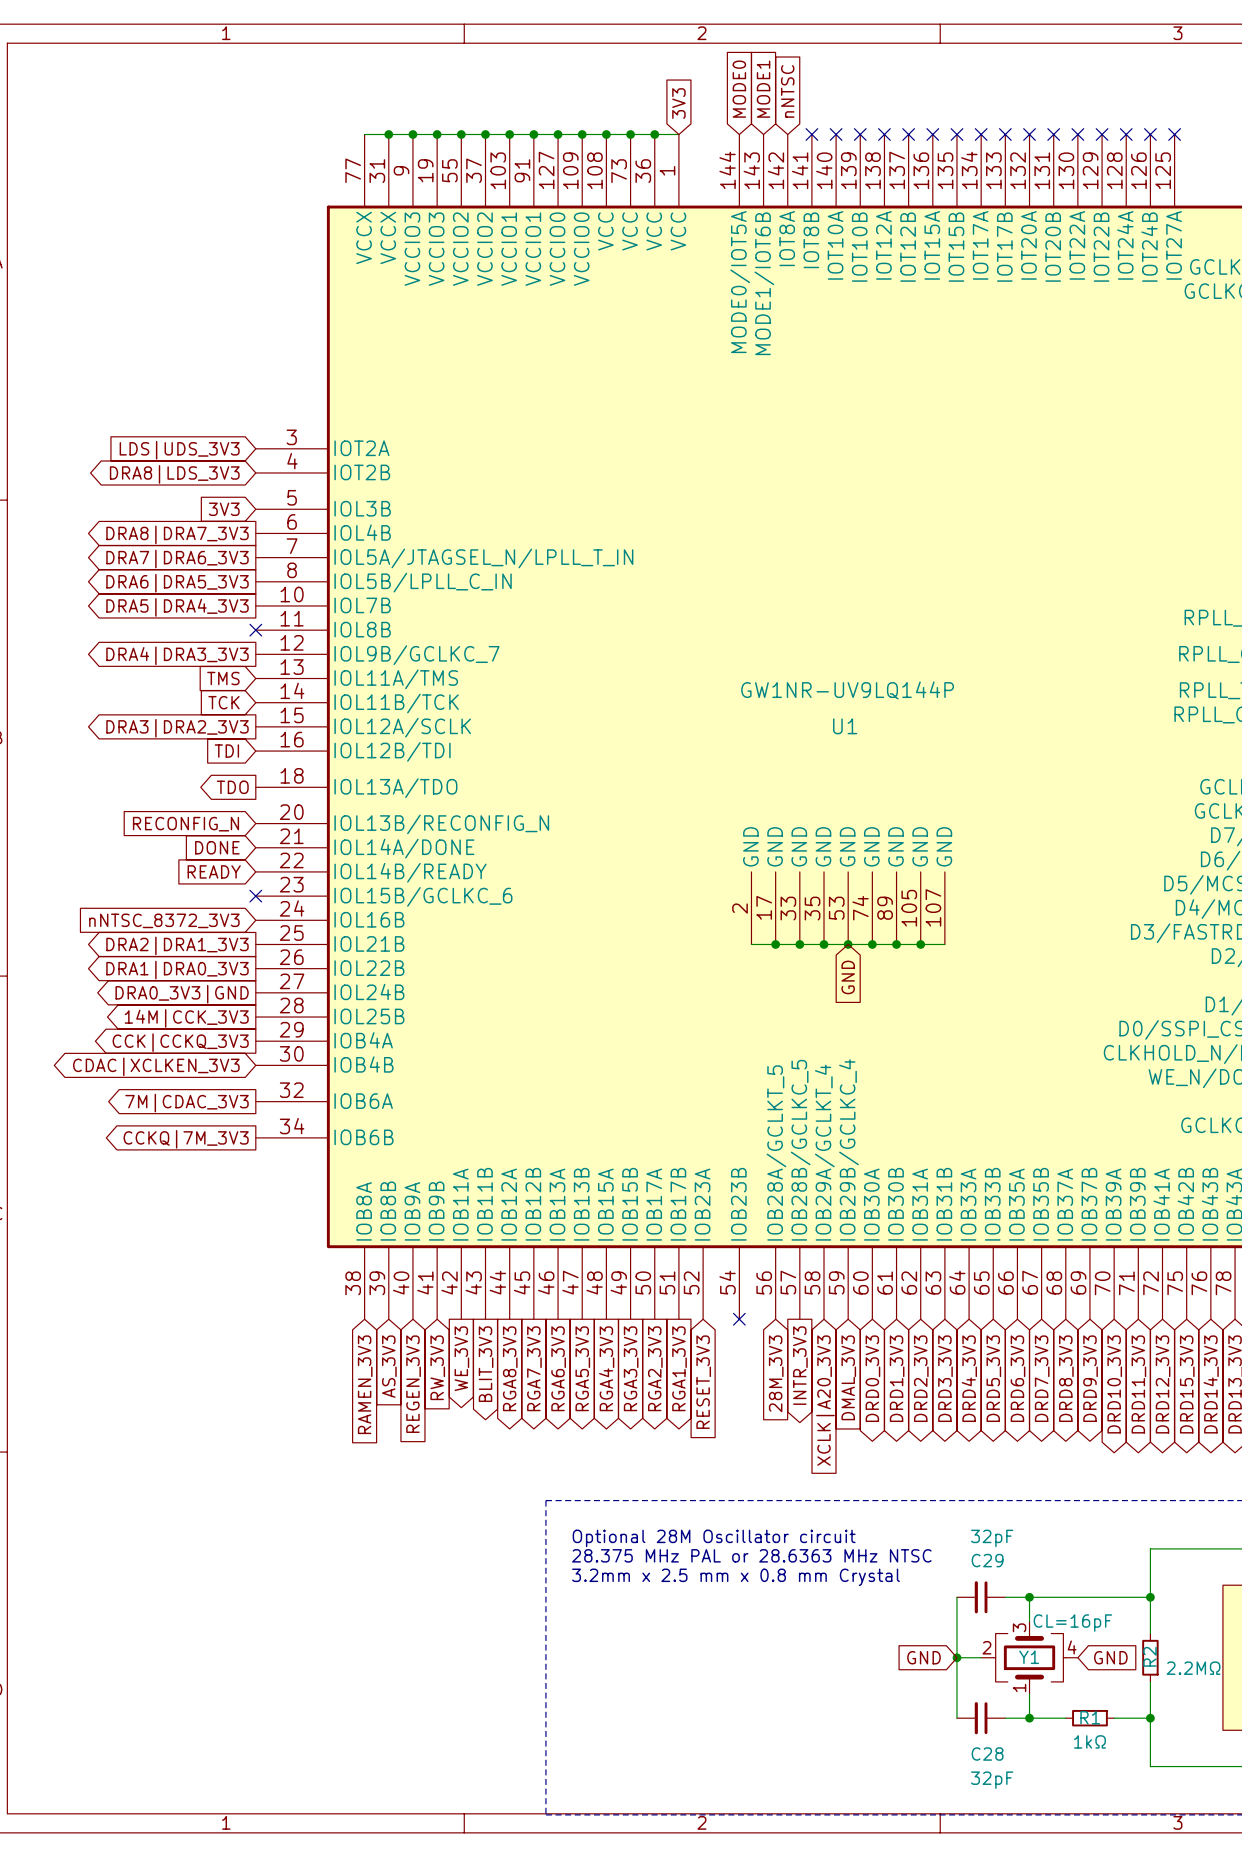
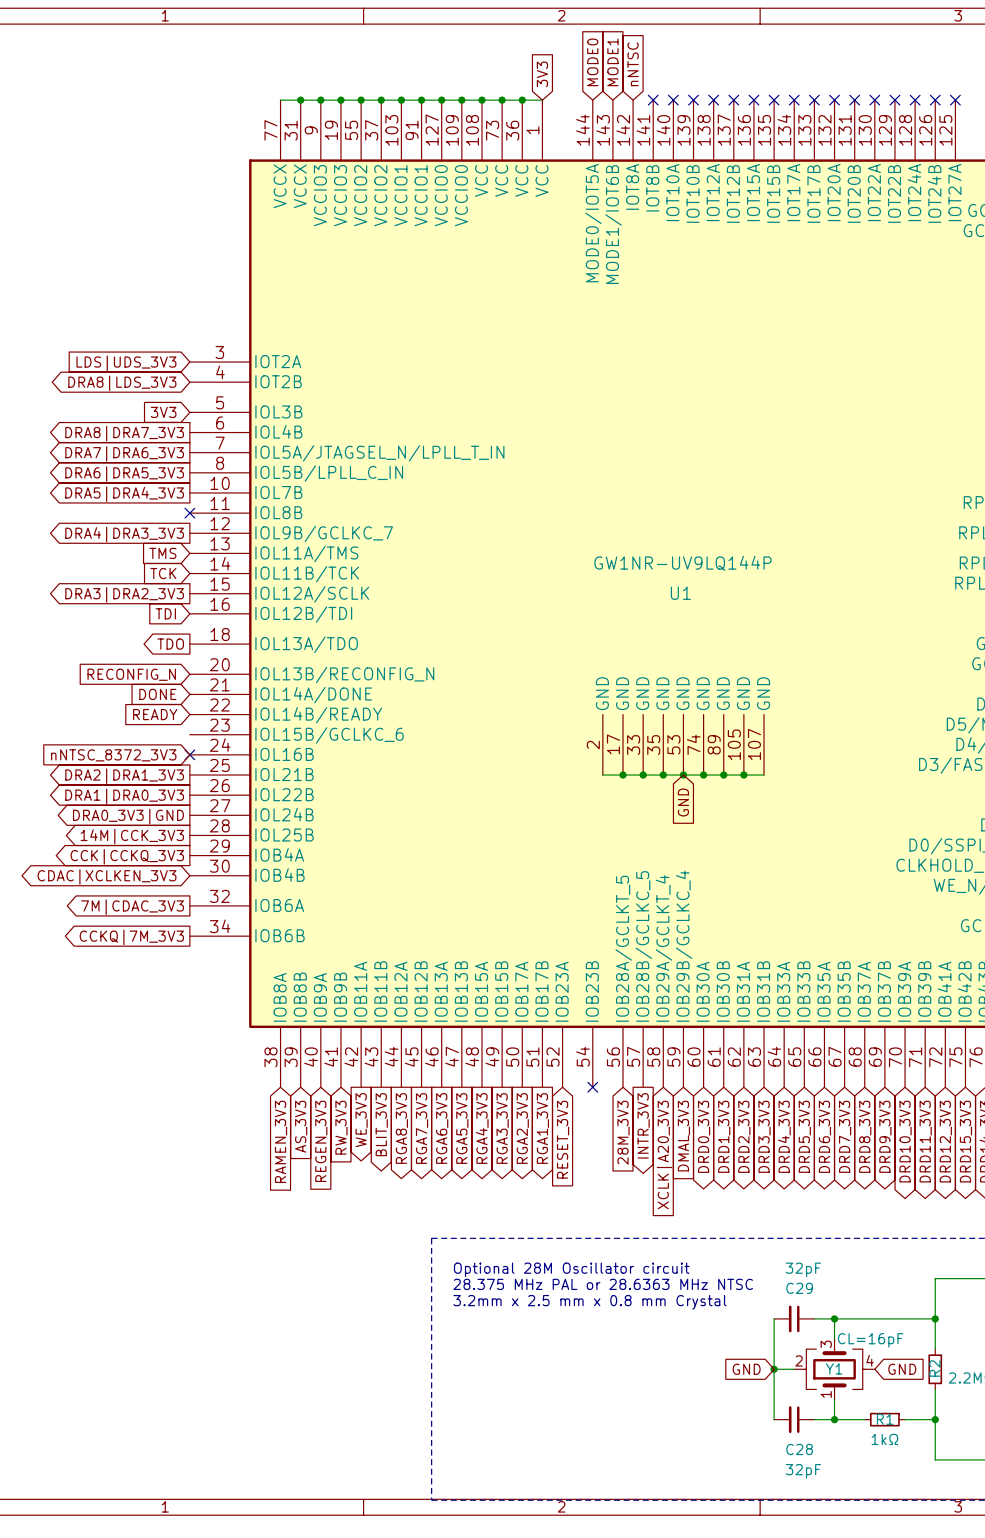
no-connect mark position: (255, 896) -> (189, 754)

